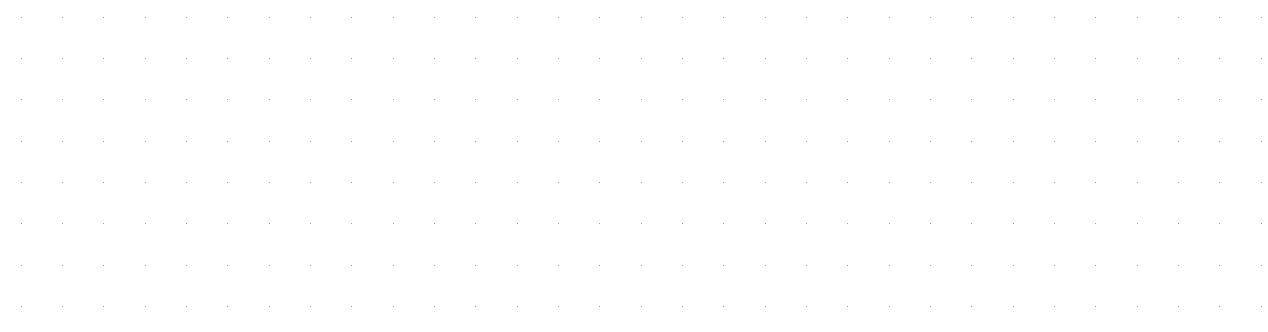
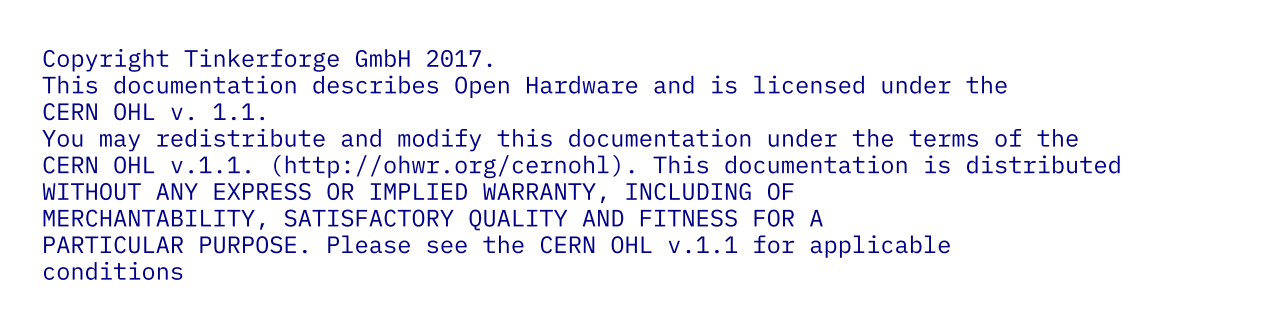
text: none -> Copyright Tinkerforge GmbH 2017. (267, 60)
text: none -> This documentation describes Open Hardware and is licensed under the (524, 86)
text: none -> CERN OHL v. 1.1. (153, 111)
text: none -> You may redistribute and modify this documentation under the terms of the (560, 140)
text: none -> CERN OHL v.1.1. (http://ohwr.org/cernohl). This documentation is distributed (581, 166)
text: none -> WITHOUT ANY EXPRESS OR IMPLIED WARRANTY, INCLUDING OF (418, 193)
text: none -> MERCHANTABILITY, SATISFACTORY QUALITY AND FITNESS FOR A (433, 219)
text: none -> PARTICULAR PURPOSE. Please see the CERN OHL v.1.1 for applicable (496, 246)
text: none -> conditions (113, 270)

